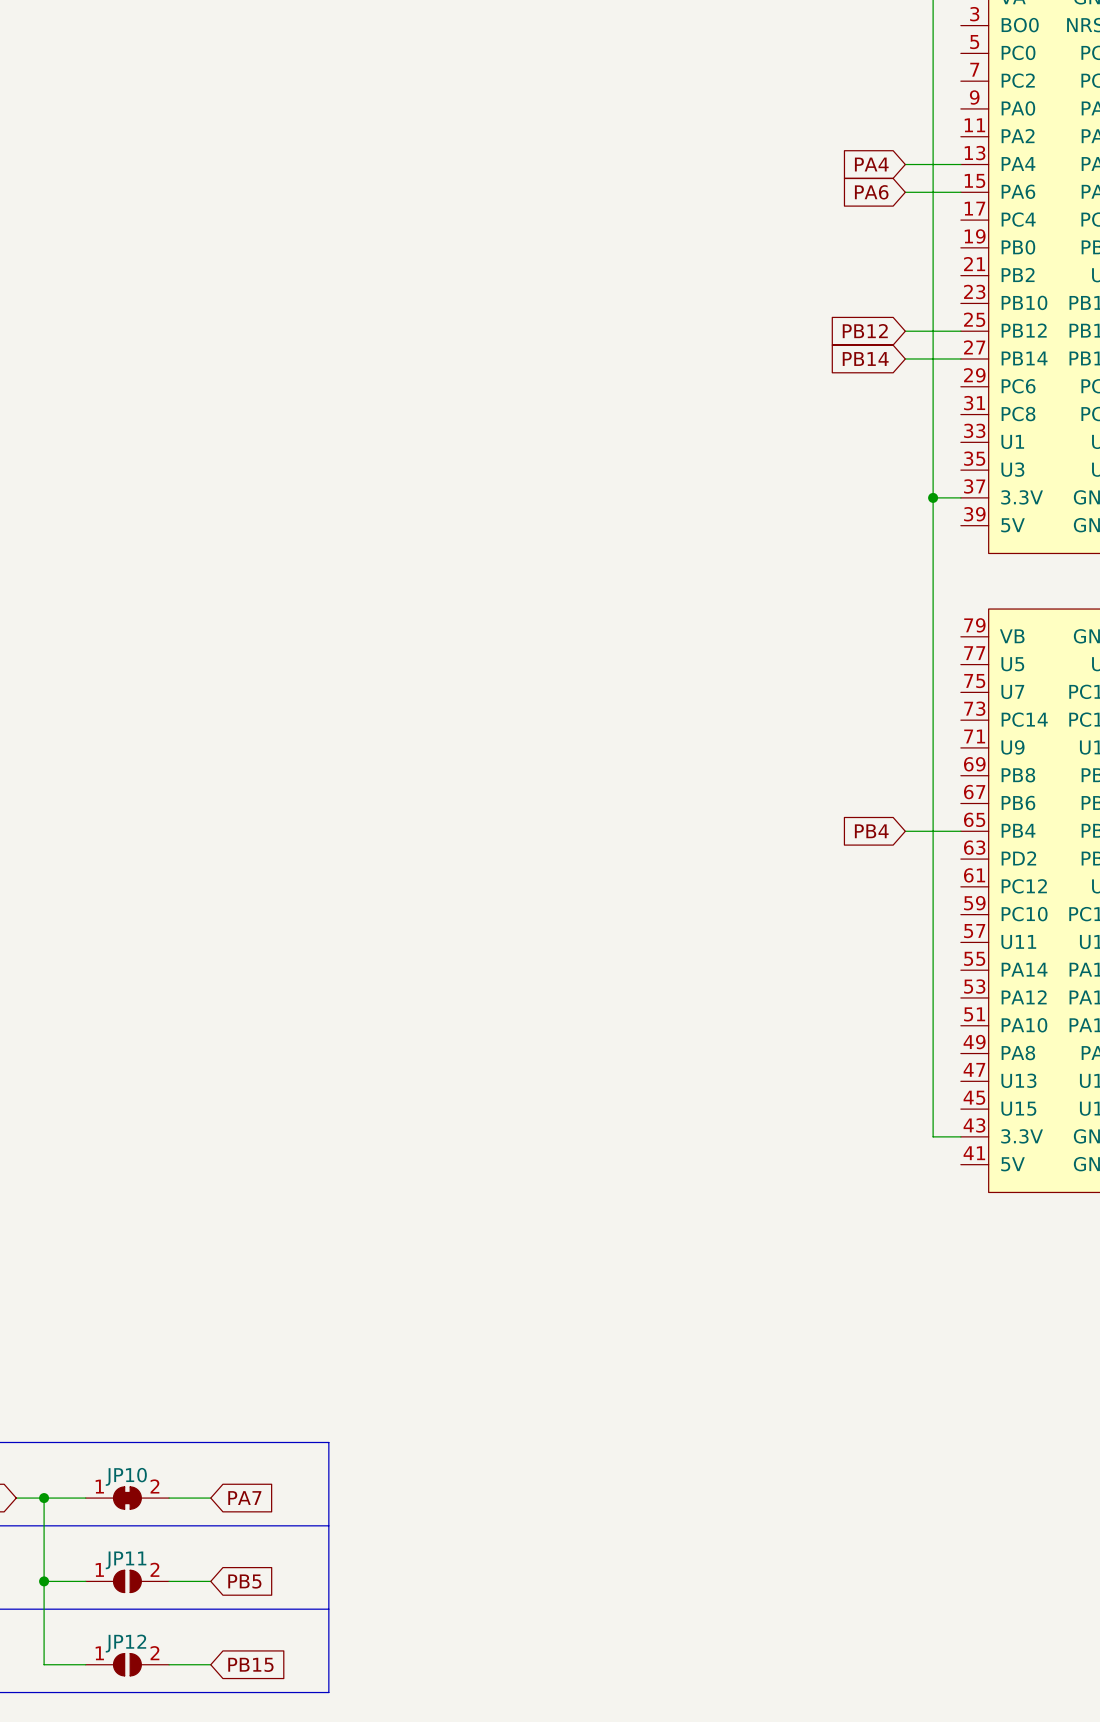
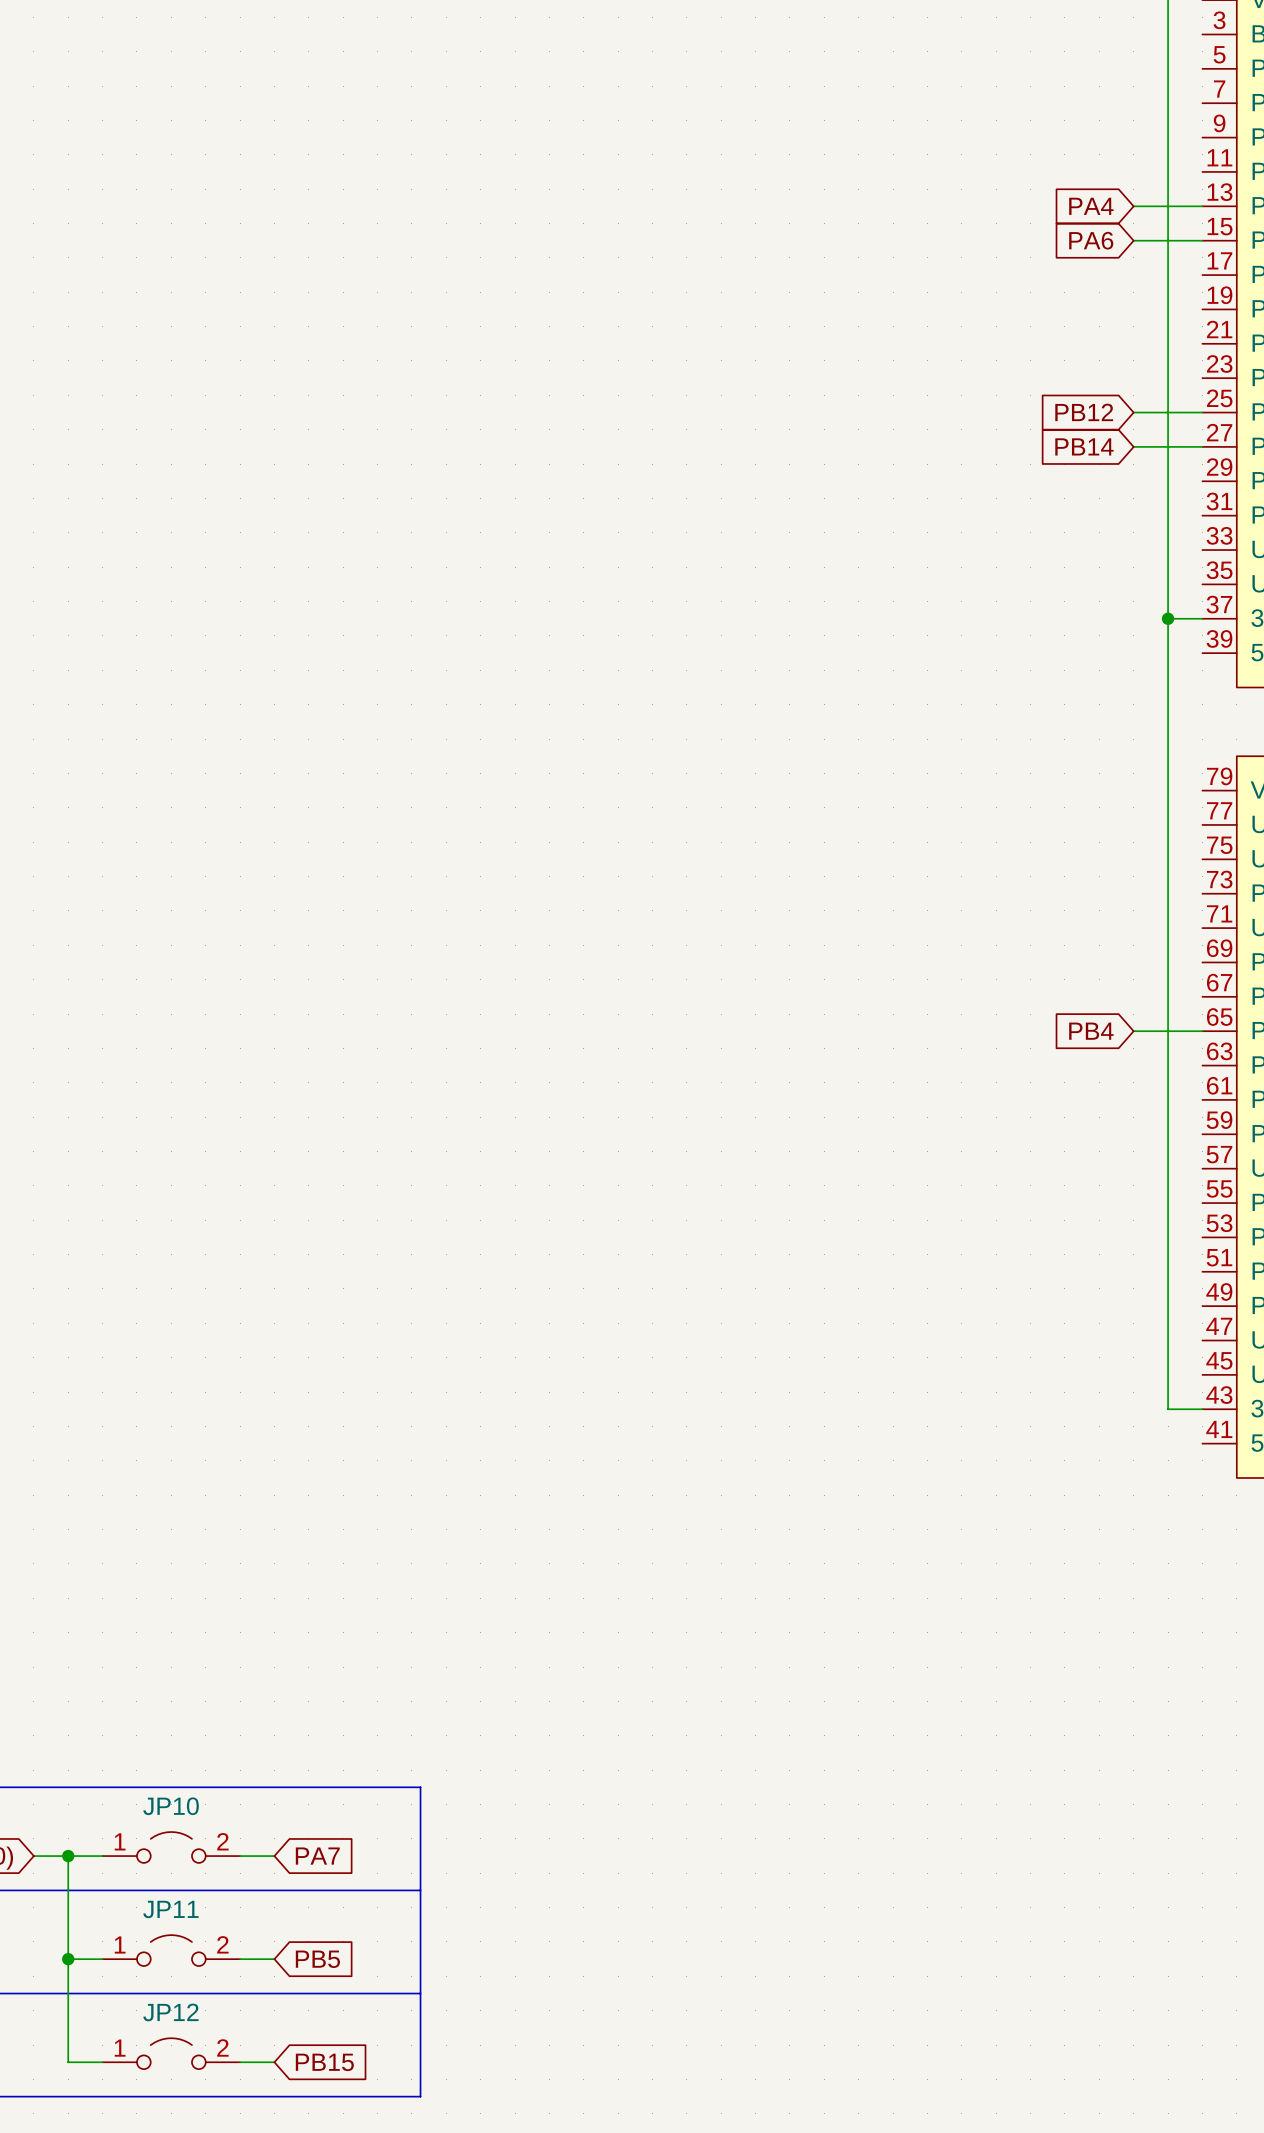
JP10 symbol: [85, 1486, 170, 1510] -> [102, 1831, 241, 1863]
JP11 symbol: [85, 1570, 170, 1593] -> [102, 1935, 241, 1967]
JP12 symbol: [85, 1653, 170, 1676] -> [102, 2038, 241, 2070]

